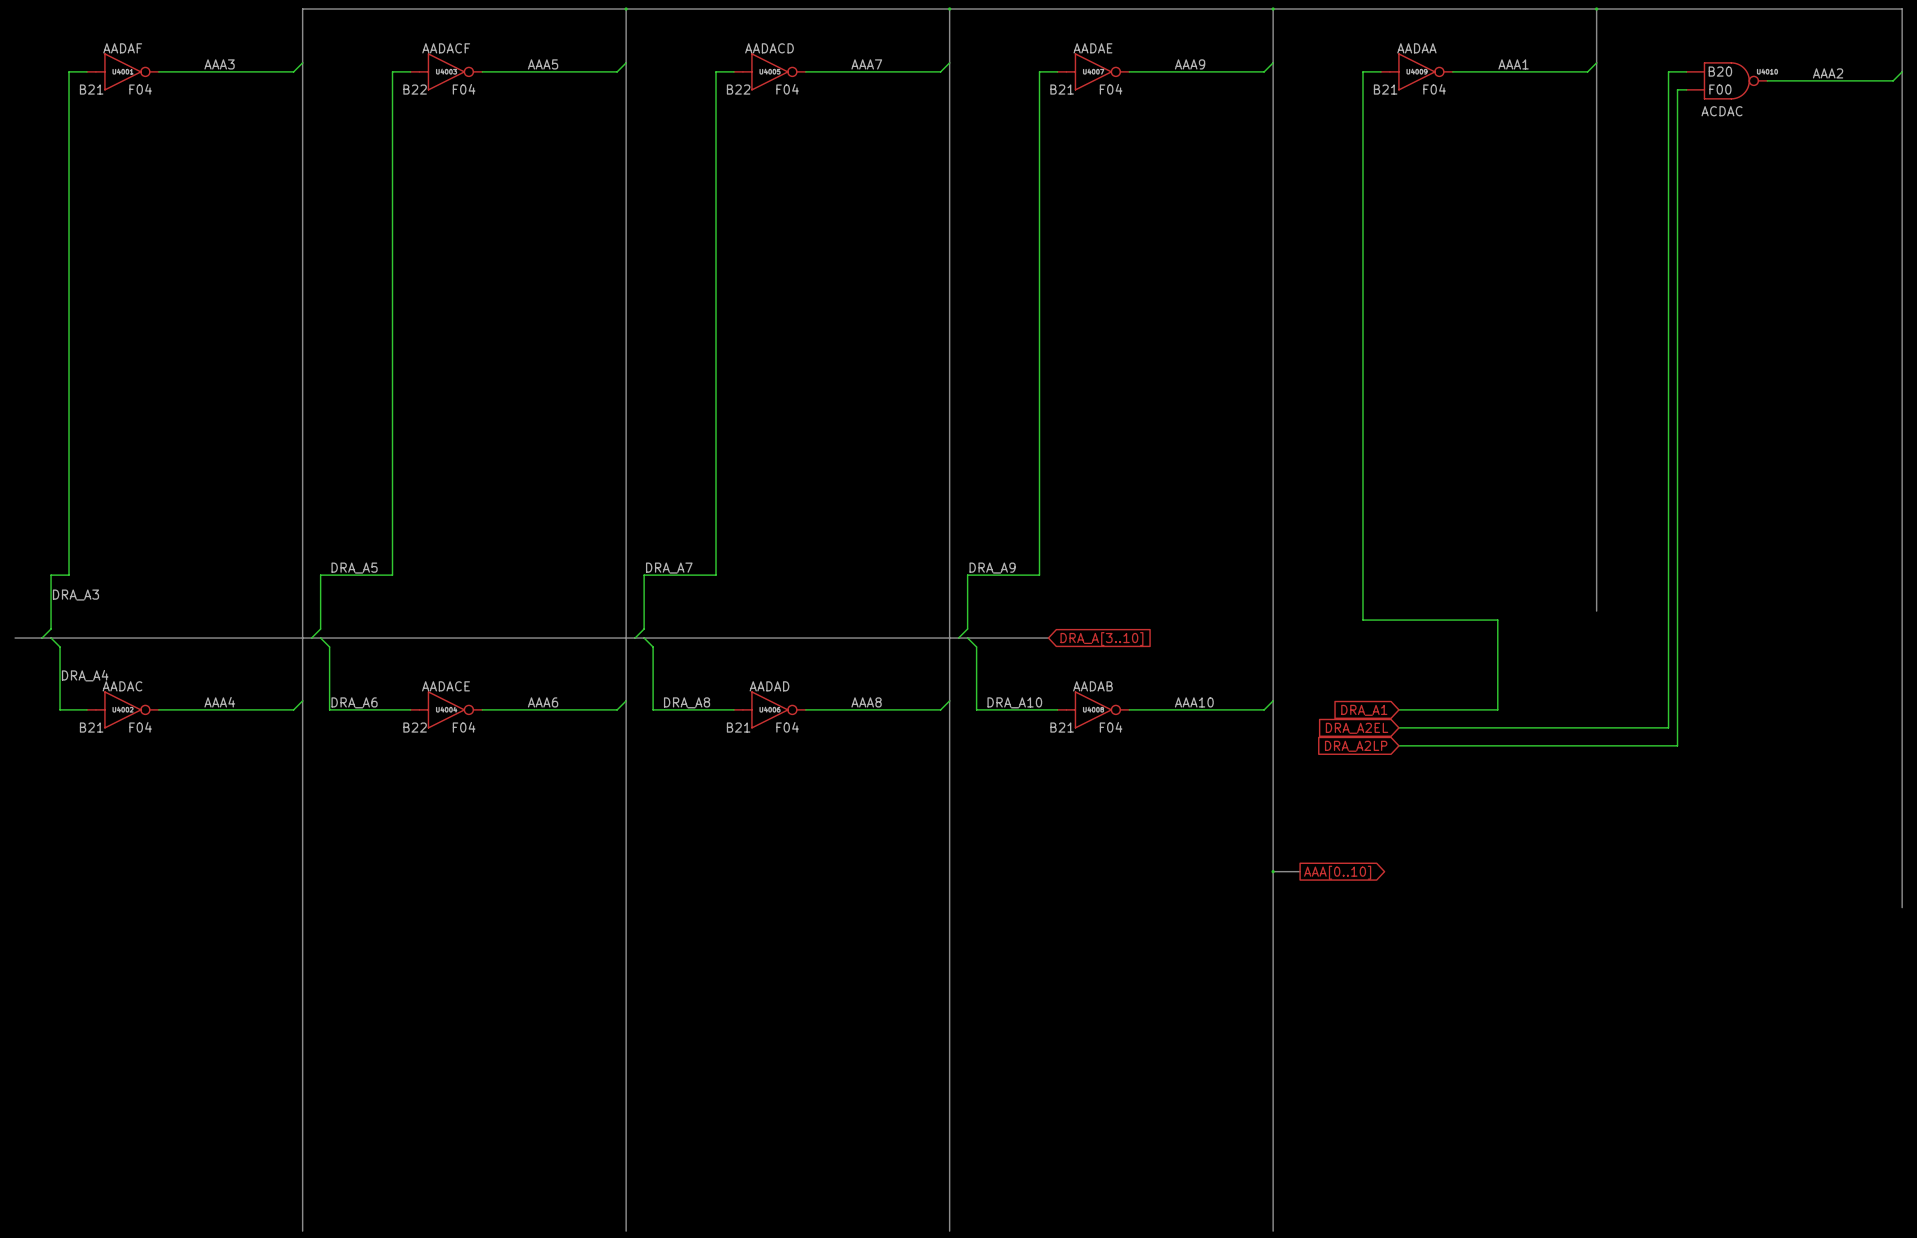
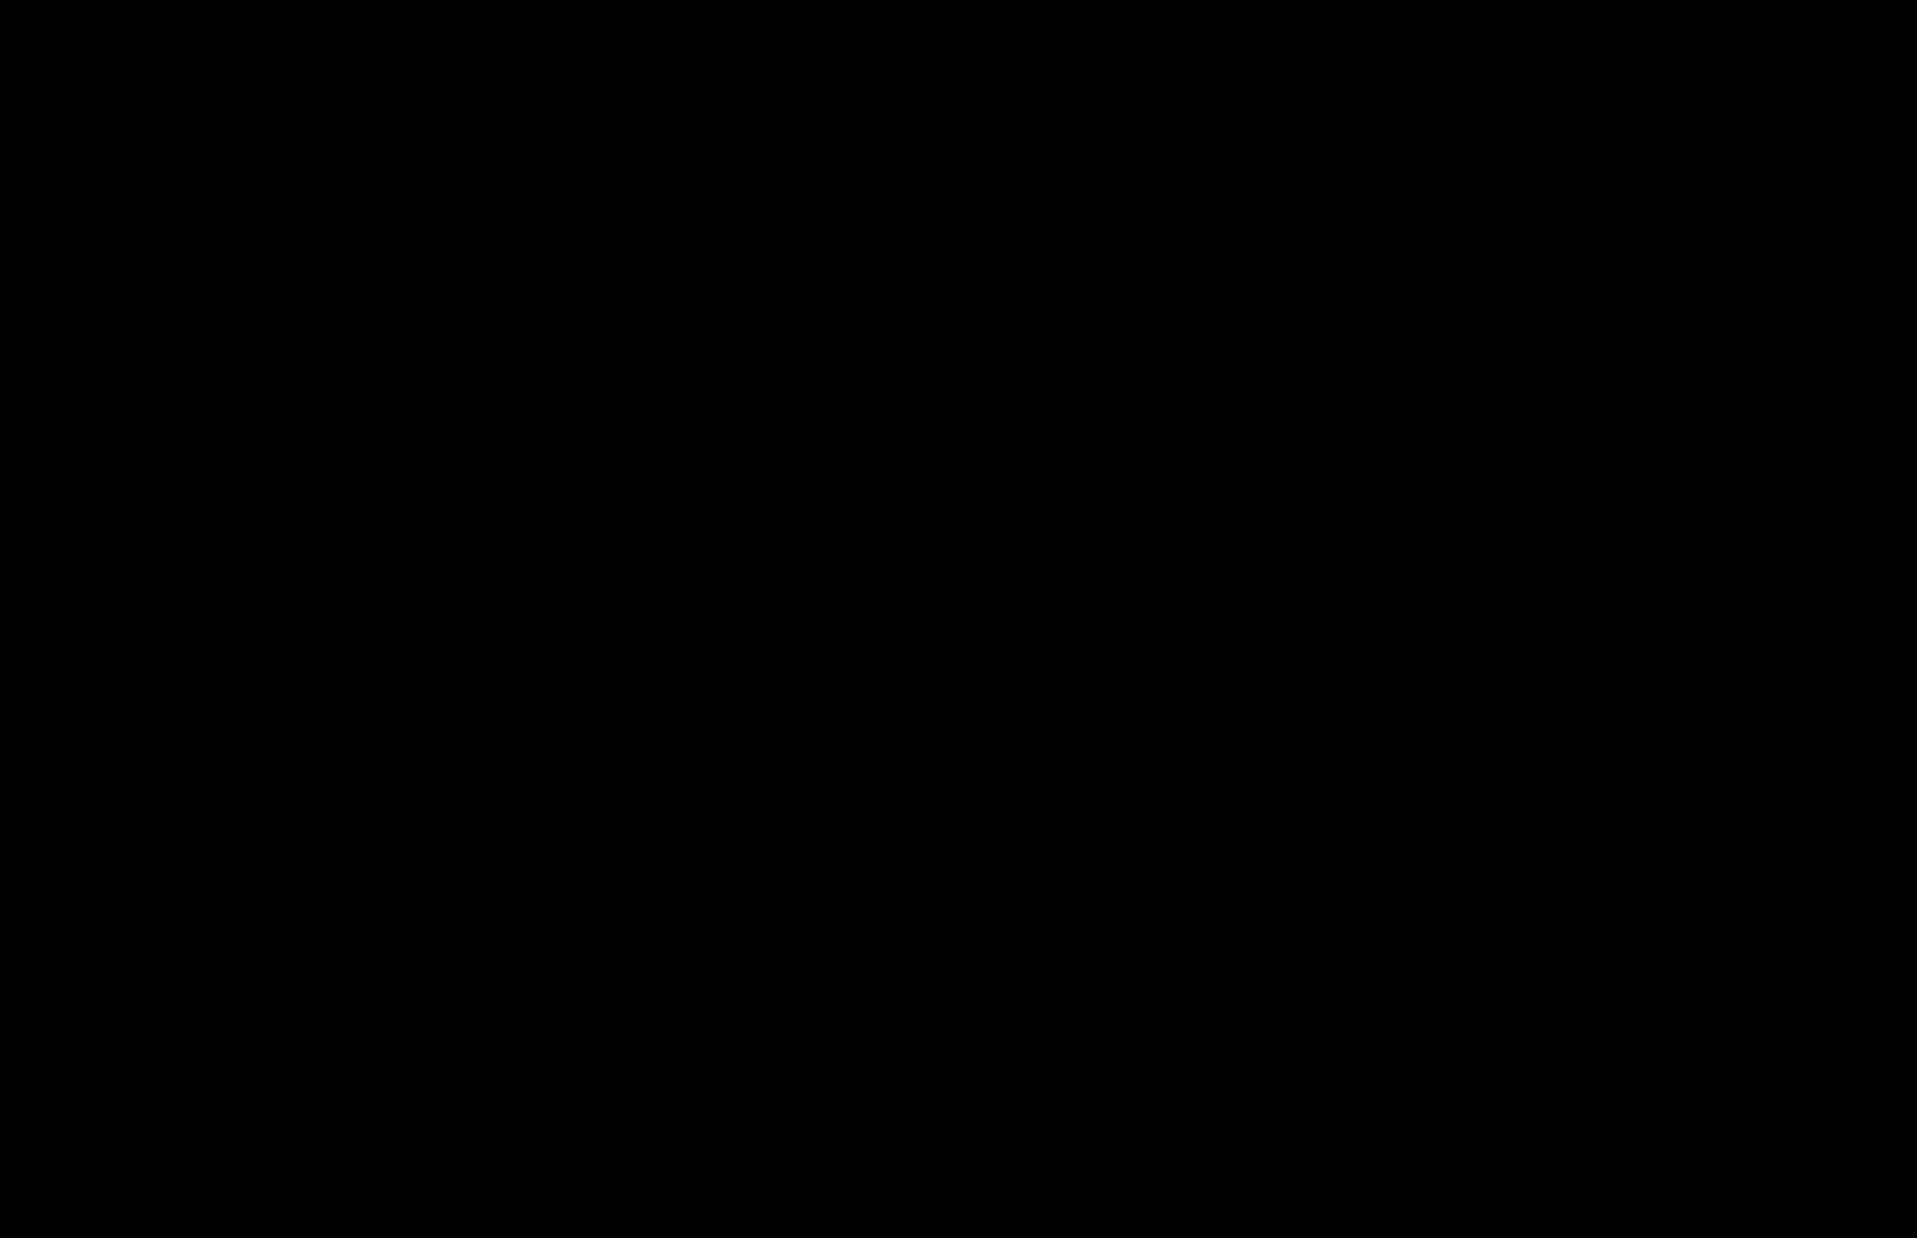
bus: (626, 9) (626, 1231) -> none
junction: (626, 9) -> none
bus: (949, 9) (949, 1231) -> none
junction: (949, 9) -> none
bus: (1273, 9) (1273, 1231) -> none
junction: (1273, 9) -> none
bus: (1596, 9) (1596, 611) -> none
junction: (1596, 9) -> none
wire: (302, 62) (293, 71) (158, 71) -> none
wire: (626, 62) (617, 71) (482, 71) -> none
wire: (949, 62) (940, 71) (805, 71) -> none
wire: (1273, 62) (1264, 71) (1129, 71) -> none
wire: (1596, 62) (1587, 71) (1452, 71) -> none
label: AAA3 (219, 64) -> none
label: AAA5 (543, 64) -> none
label: AAA7 (866, 64) -> none
label: AAA9 (1190, 64) -> none
label: AAA1 (1513, 64) -> none
wire: (86, 71) (69, 71) (69, 575) (51, 575) (51, 629) (42, 638) -> none
part: F04 (122, 71) -> none
wire: (410, 71) (392, 71) (392, 575) (320, 575) (320, 629) (311, 638) -> none
part: F04 (446, 71) -> none
wire: (733, 71) (716, 71) (716, 575) (644, 575) (644, 629) (635, 638) -> none
part: F04 (769, 71) -> none
wire: (1057, 71) (1039, 71) (1039, 575) (967, 575) (967, 629) (958, 638) -> none
part: F04 (1093, 71) -> none
wire: (1380, 71) (1362, 71) (1362, 620) (1497, 620) (1497, 709) (1398, 709) -> none
part: F04 (1416, 71) -> none
wire: (1686, 71) (1668, 71) (1668, 727) (1398, 727) -> none
wire: (1902, 71) (1893, 80) (1767, 80) -> none
label: AAA2 (1828, 73) -> none
part: F00 (1726, 80) -> none
wire: (1686, 89) (1677, 89) (1677, 745) (1398, 745) -> none
label: DRA_A5 (354, 568) -> none
label: DRA_A7 (669, 568) -> none
label: DRA_A9 (992, 568) -> none
label: DRA_A3 (75, 595) -> none
bus: (15, 638) (1048, 638) -> none
wire: (51, 638) (60, 647) (60, 709) (86, 709) -> none
wire: (320, 638) (329, 647) (329, 709) (410, 709) -> none
wire: (644, 638) (653, 647) (653, 709) (733, 709) -> none
wire: (967, 638) (976, 647) (976, 709) (1057, 709) -> none
global label: DRA_A[3..10] (1101, 639) -> none
label: DRA_A4 (85, 675) -> none
wire: (302, 700) (293, 709) (158, 709) -> none
wire: (626, 700) (617, 709) (482, 709) -> none
wire: (949, 700) (940, 709) (805, 709) -> none
wire: (1273, 700) (1264, 709) (1129, 709) -> none
label: AAA4 (219, 702) -> none
label: DRA_A6 (354, 702) -> none
label: AAA6 (543, 702) -> none
label: DRA_A8 (687, 702) -> none
label: AAA8 (866, 702) -> none
label: DRA_A10 (1014, 702) -> none
label: AAA10 (1194, 702) -> none
part: F04 (122, 709) -> none
part: F04 (446, 709) -> none
part: F04 (769, 709) -> none
part: F04 (1093, 709) -> none
global label: DRA_A1 (1364, 710) -> none
global label: DRA_A2EL (1357, 728) -> none
global label: DRA_A2LP (1356, 746) -> none
bus: (1273, 871) (1300, 871) -> none
junction: (1273, 871) -> none
global label: AAA[0..10] (1337, 872) -> none
bus: (1902, 907) (1902, 9) (302, 9) (302, 1231) -> none

